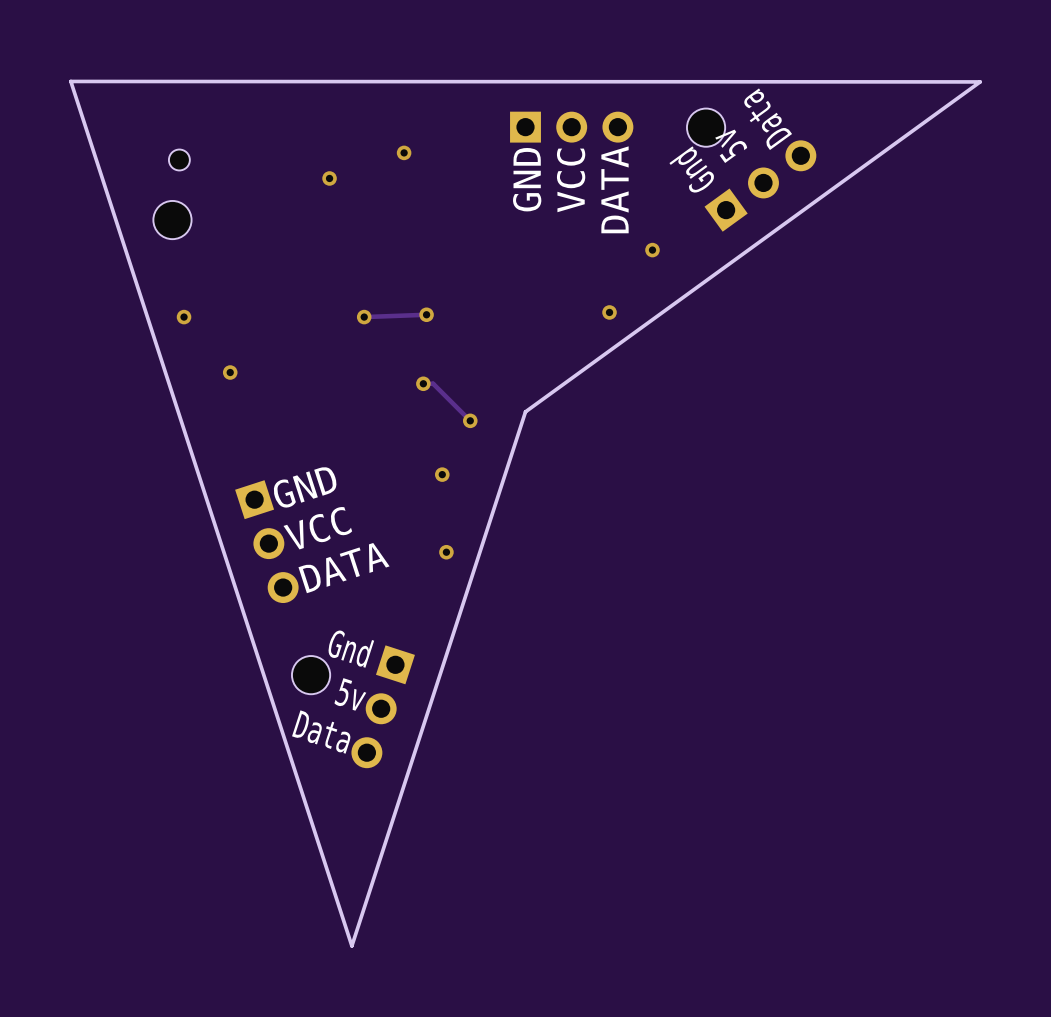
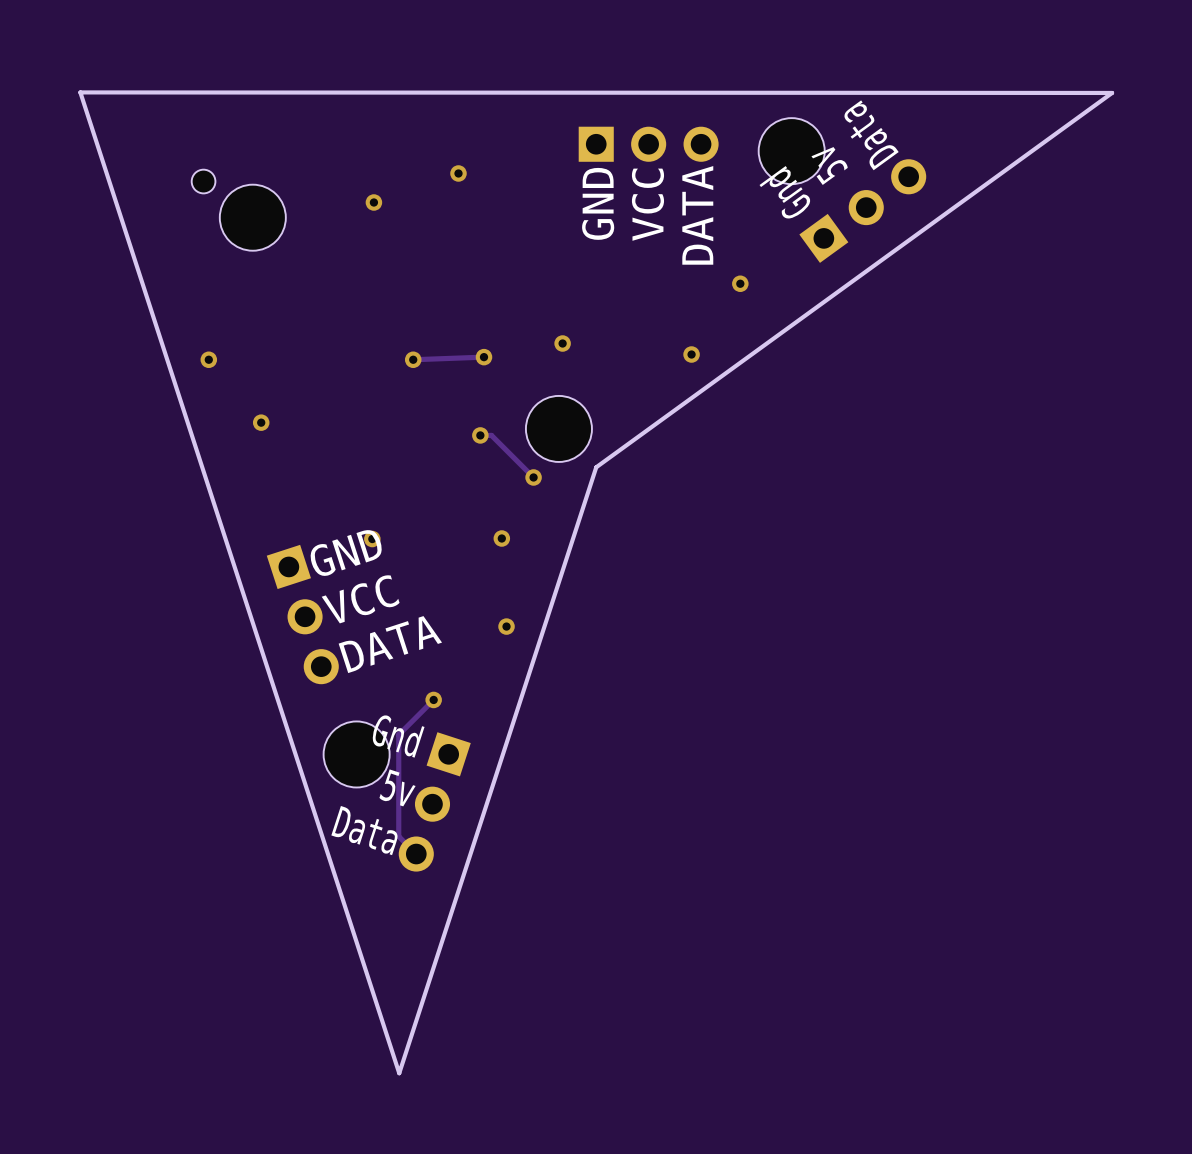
part footprint: [686, 108, 726, 147] -> [758, 118, 825, 185]
part: none -> (252, 217)
part: (172, 220) -> none
via: none -> (562, 343)
part: none -> (558, 428)
via: none -> (372, 539)
track: none -> (433, 699) (398, 734) (398, 836) (416, 854)
via: none -> (433, 699)
part footprint: [291, 656, 331, 695] -> [323, 721, 390, 788]

